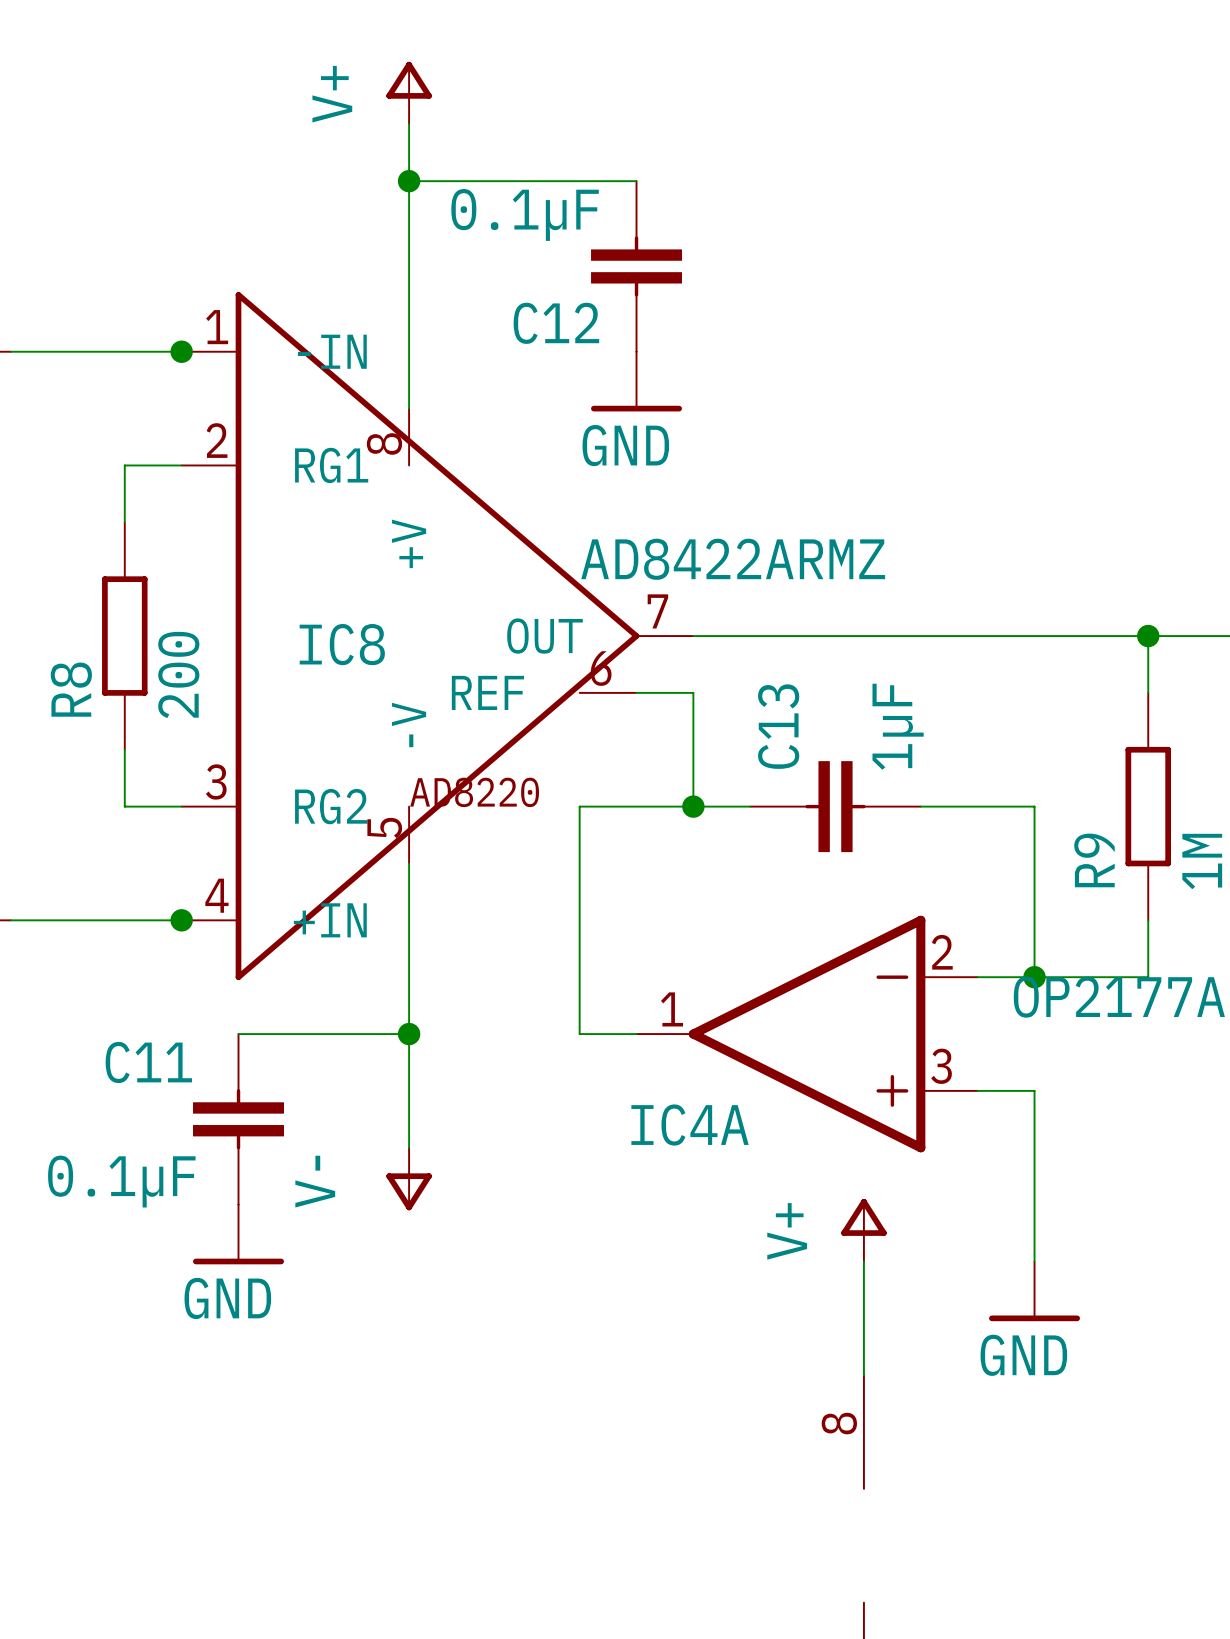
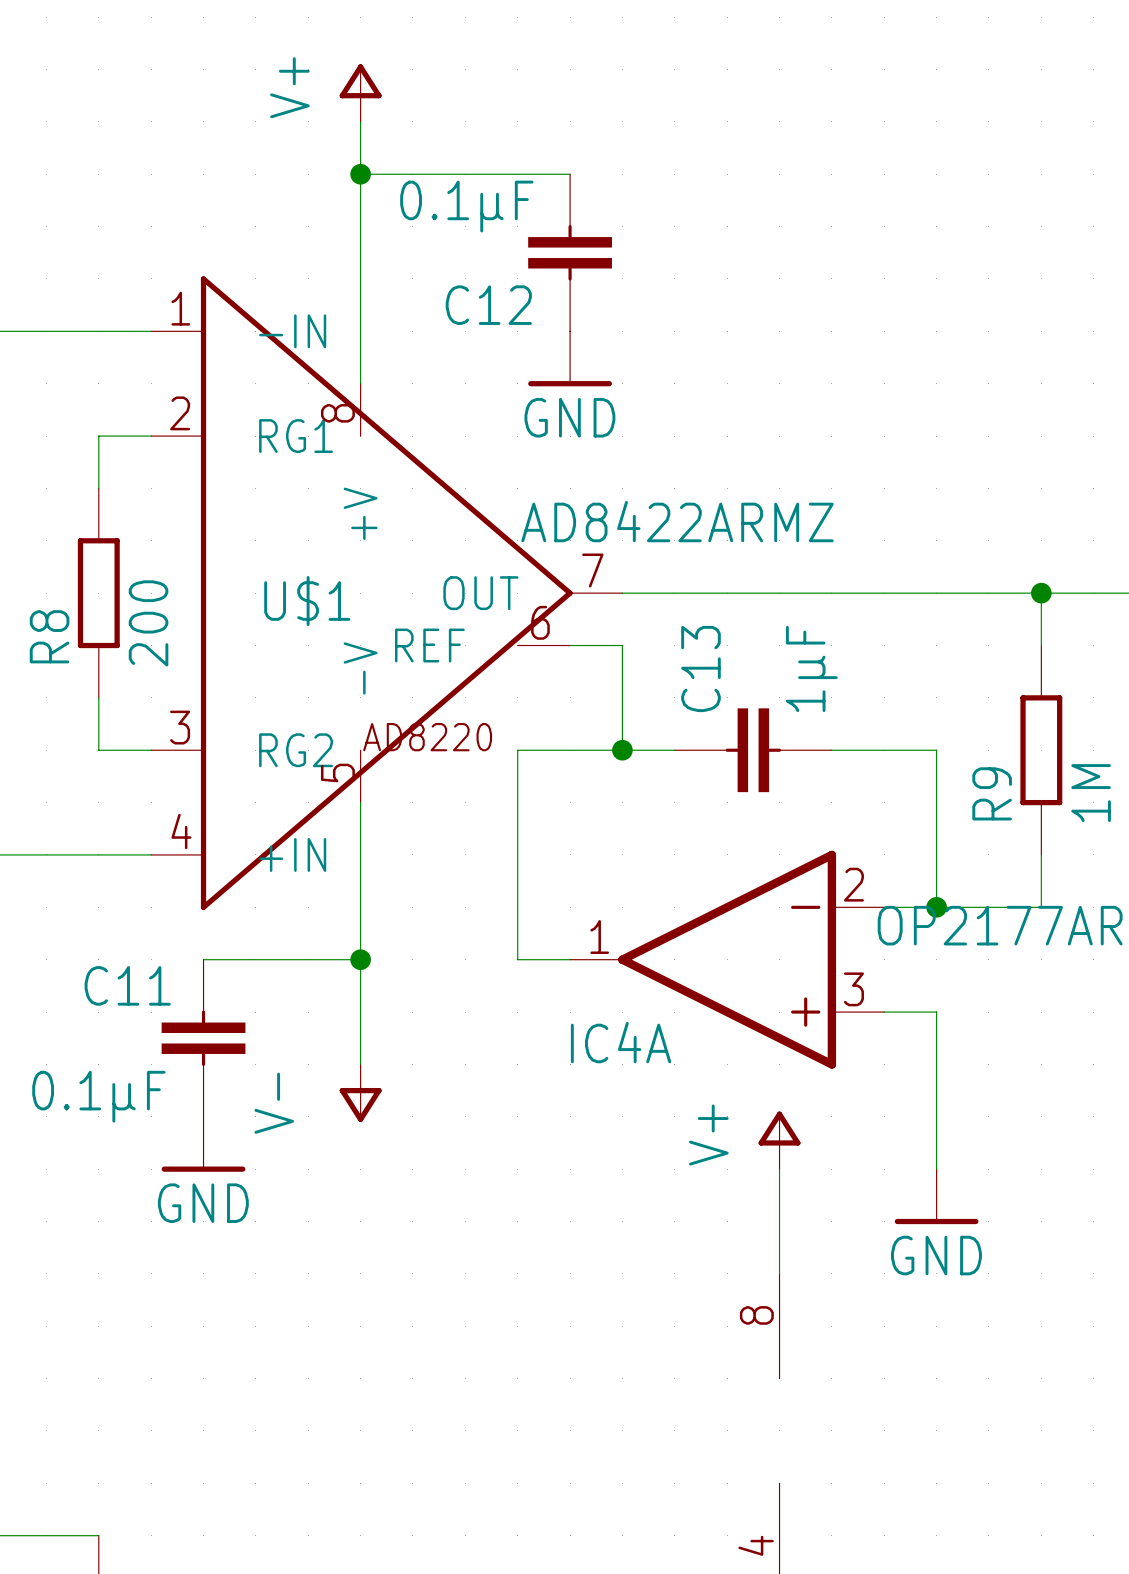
junction: (181, 351) -> none
IC8 name: IC8 (342, 644) -> U$1 (307, 601)
junction: (181, 920) -> none

